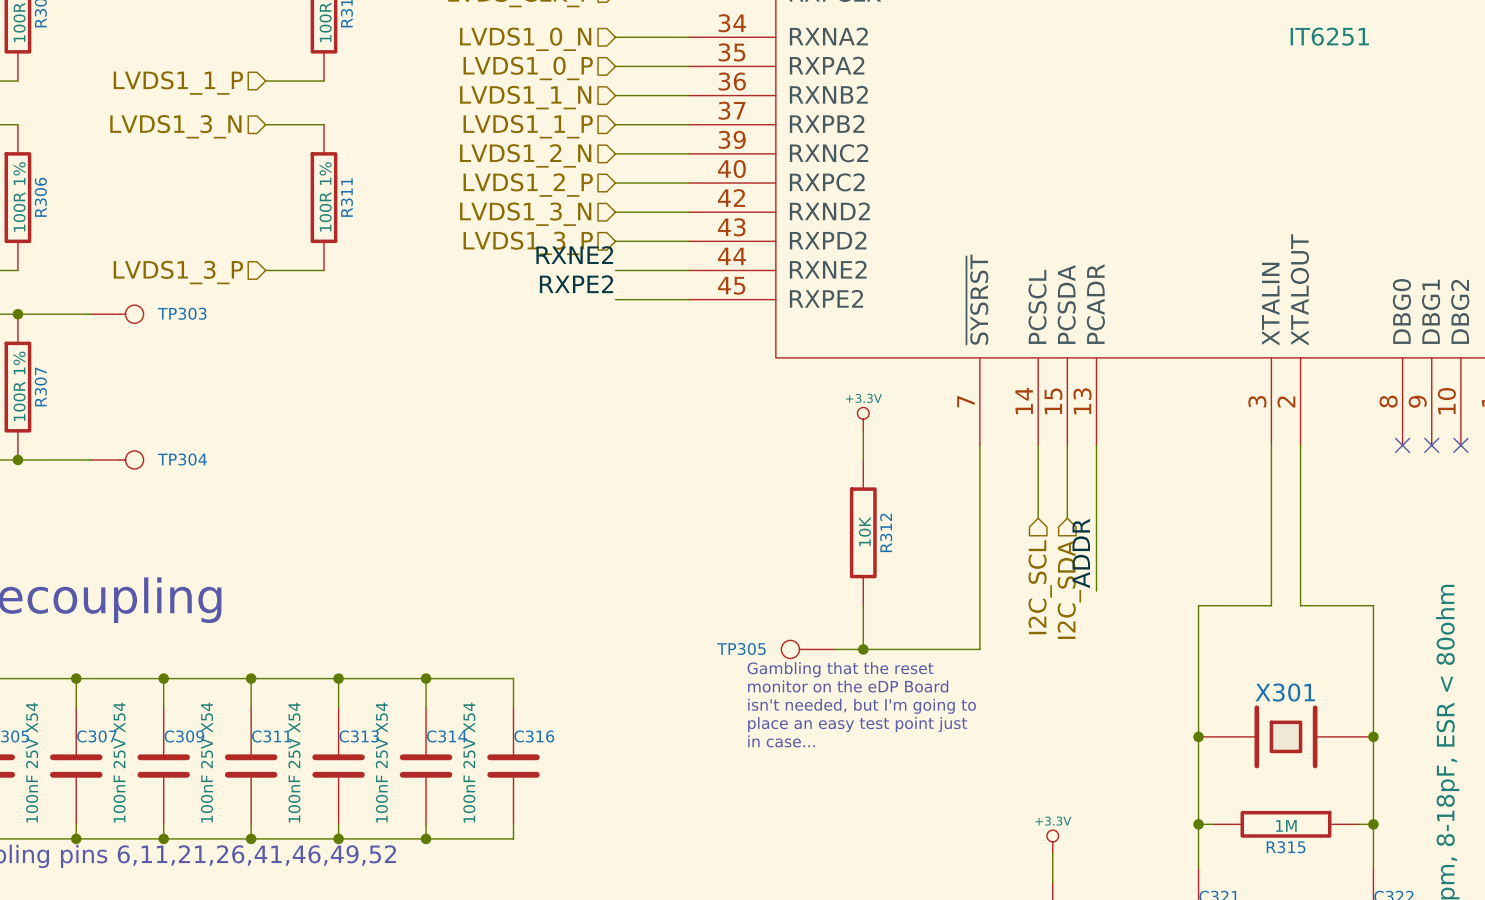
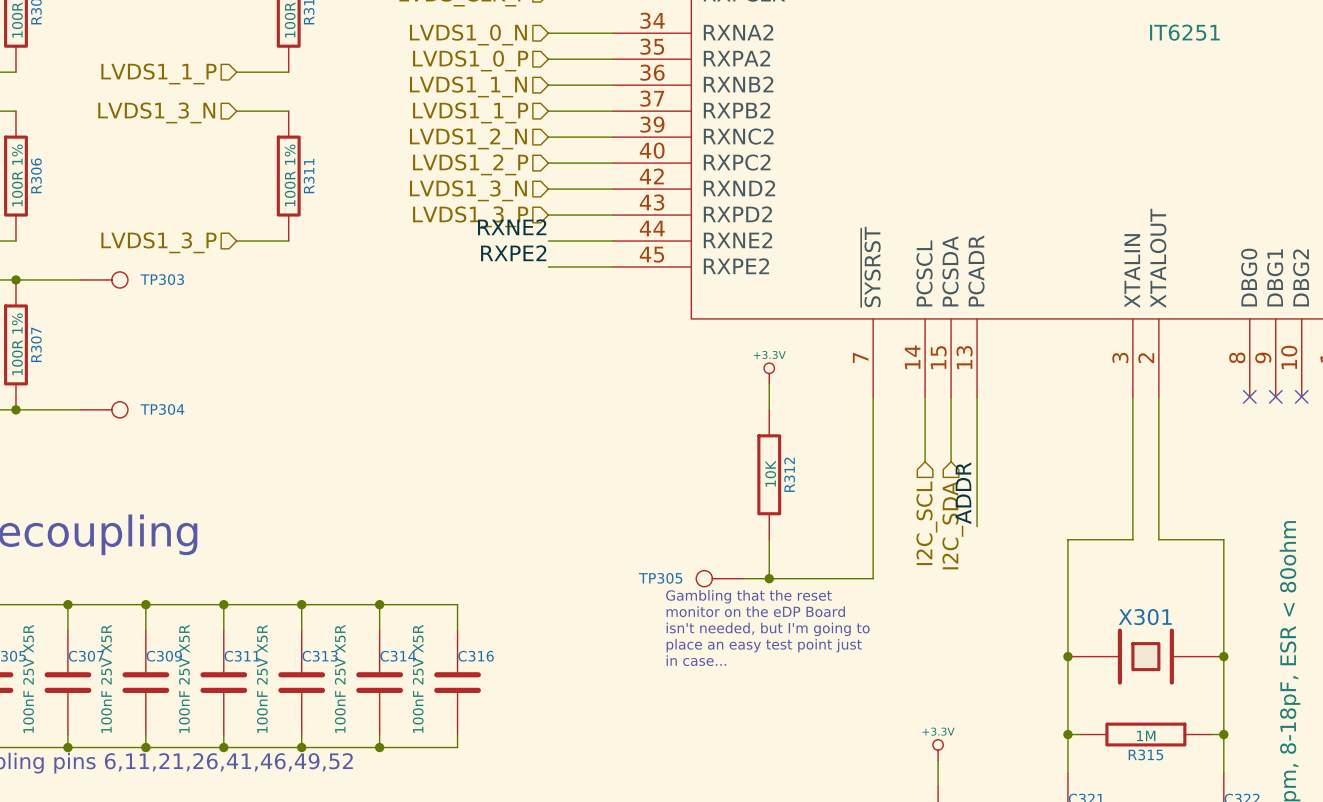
C307 value: 100nF 25V X54 (32, 762) -> 100nF 25V X5R (28, 678)
C309 value: 100nF 25V X54 (119, 762) -> 100nF 25V X5R (106, 678)
C311 value: 100nF 25V X54 (206, 762) -> 100nF 25V X5R (184, 678)
C313 value: 100nF 25V X54 (294, 762) -> 100nF 25V X5R (262, 678)
C314 value: 100nF 25V X54 (381, 762) -> 100nF 25V X5R (340, 678)
C316 value: 100nF 25V X54 (469, 762) -> 100nF 25V X5R (418, 678)

